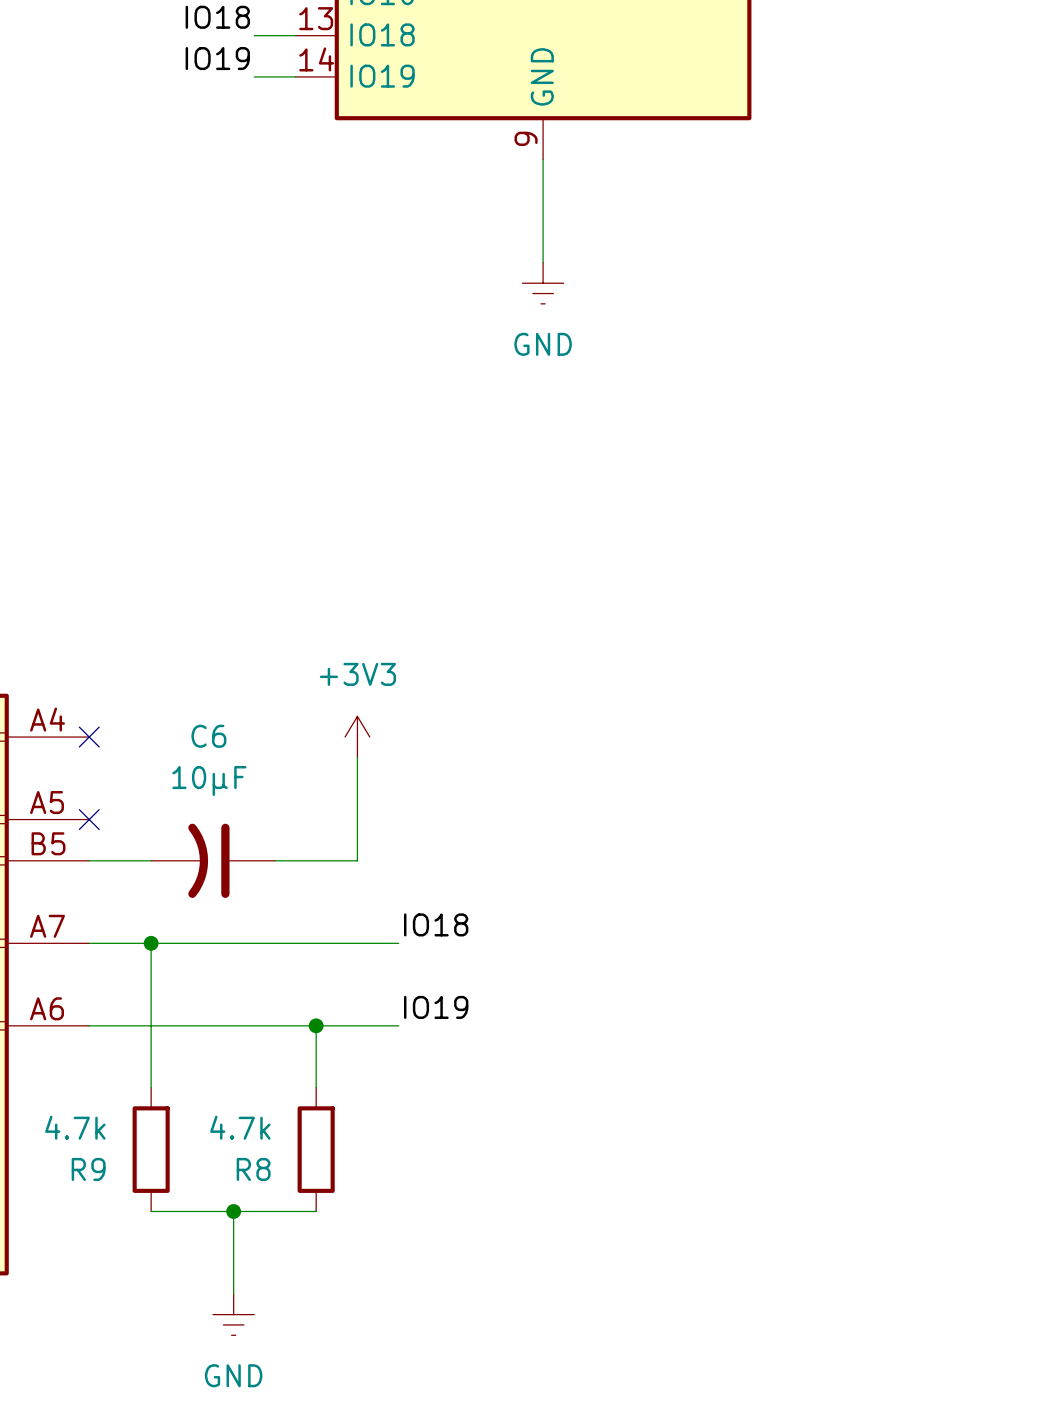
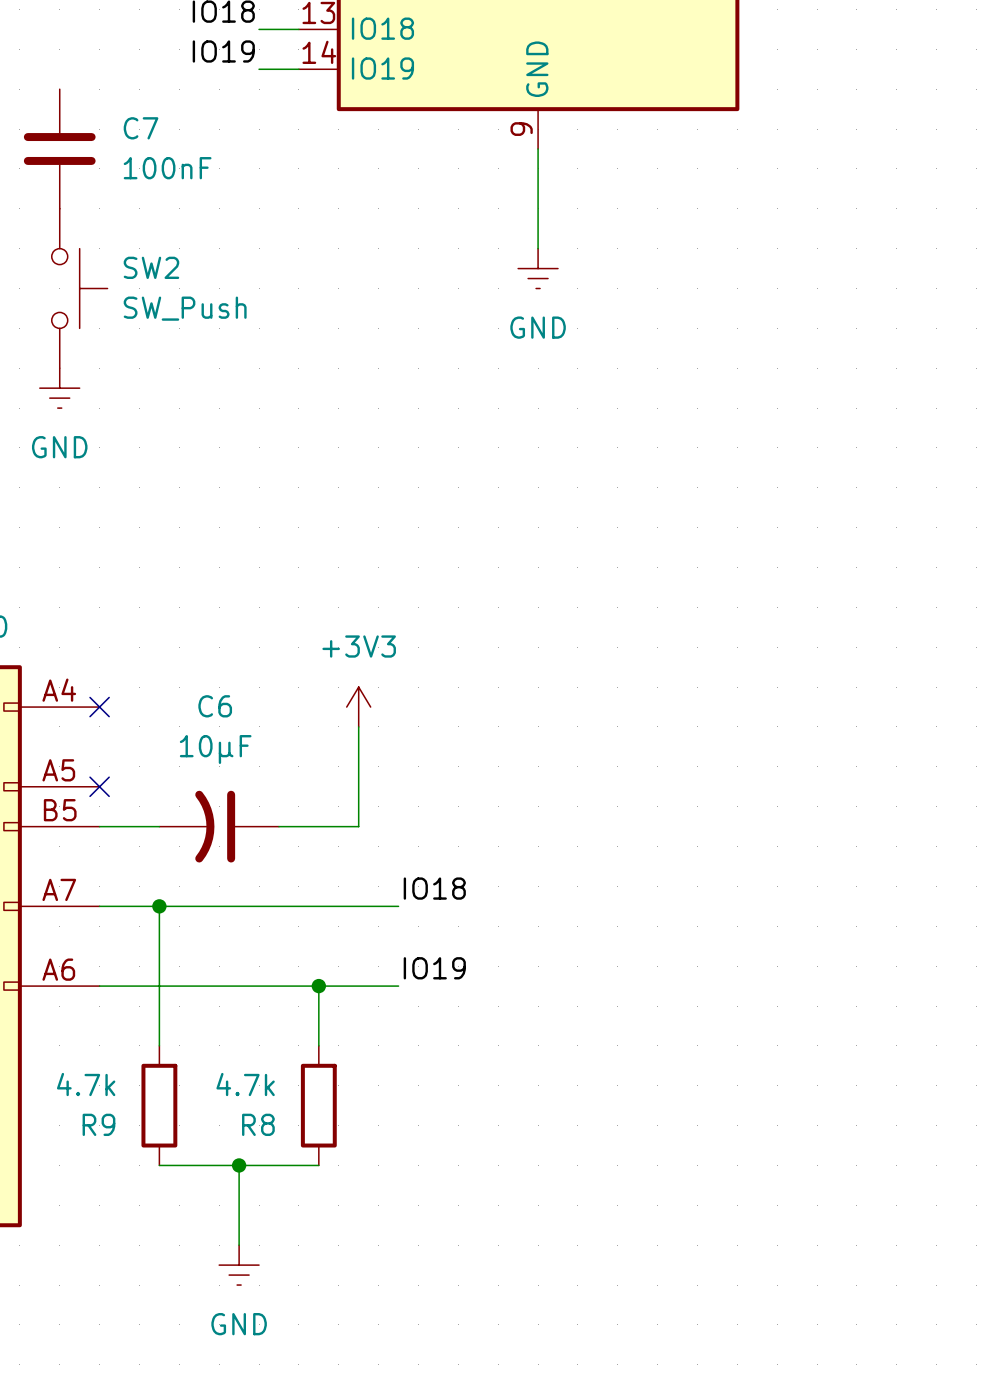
C7: none -> 100nF (59, 148)
SW2: none -> SW_Push (79, 288)
power symbol: none -> GND (59, 388)

